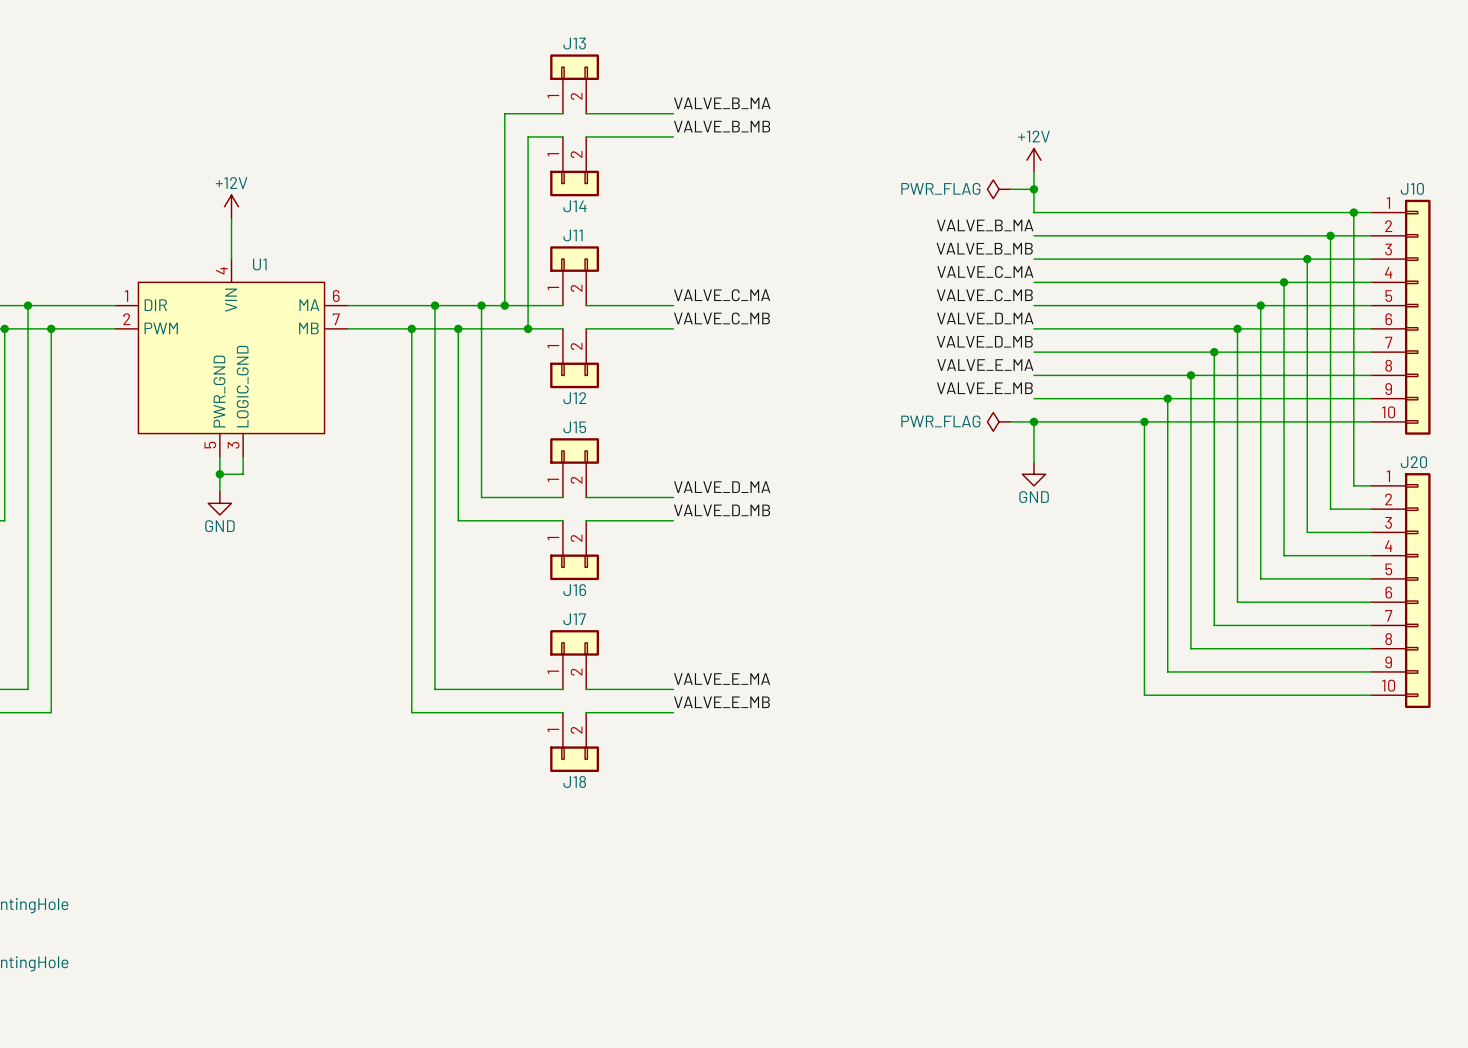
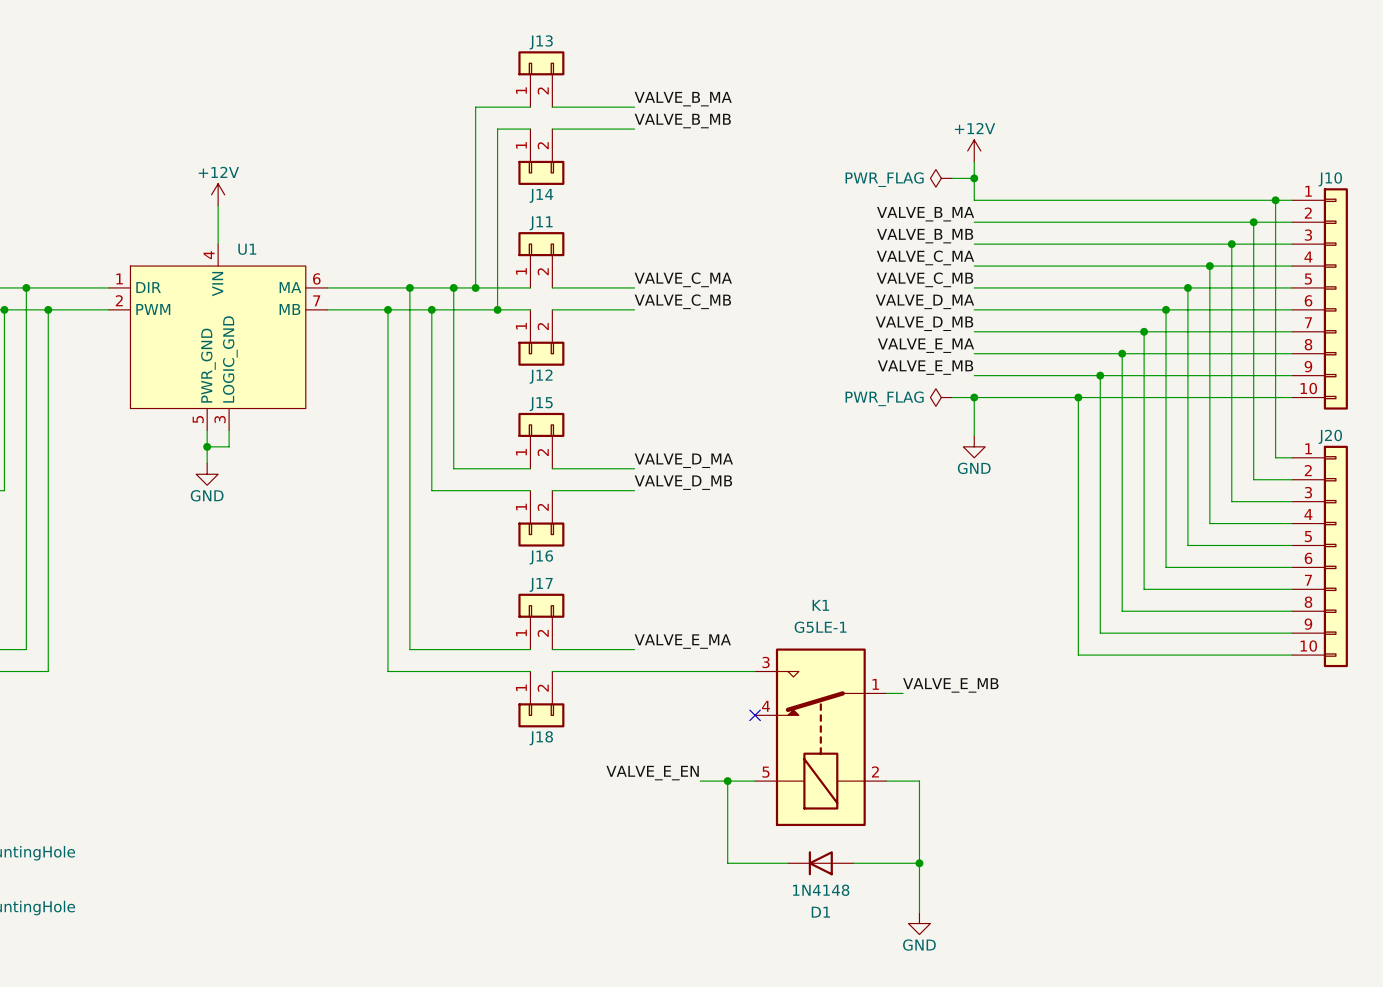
label: VALVE_E_MB (721, 702) -> none
wire: none -> (634, 671) (755, 671)
label: none -> VALVE_E_MB (950, 685)
wire: none -> (886, 693) (903, 693)
no-connect mark: none -> (755, 715)
K1: none -> G5LE-1 (820, 737)
label: none -> VALVE_E_EN (652, 773)
wire: none -> (700, 781) (755, 781)
wire: none -> (727, 781) (727, 863) (787, 863)
junction: none -> (727, 781)
wire: none -> (886, 781) (919, 781) (919, 912)
D1: none -> 1N4148 (820, 863)
wire: none -> (853, 863) (919, 863)
junction: none -> (919, 863)
power symbol: none -> GND (919, 923)

